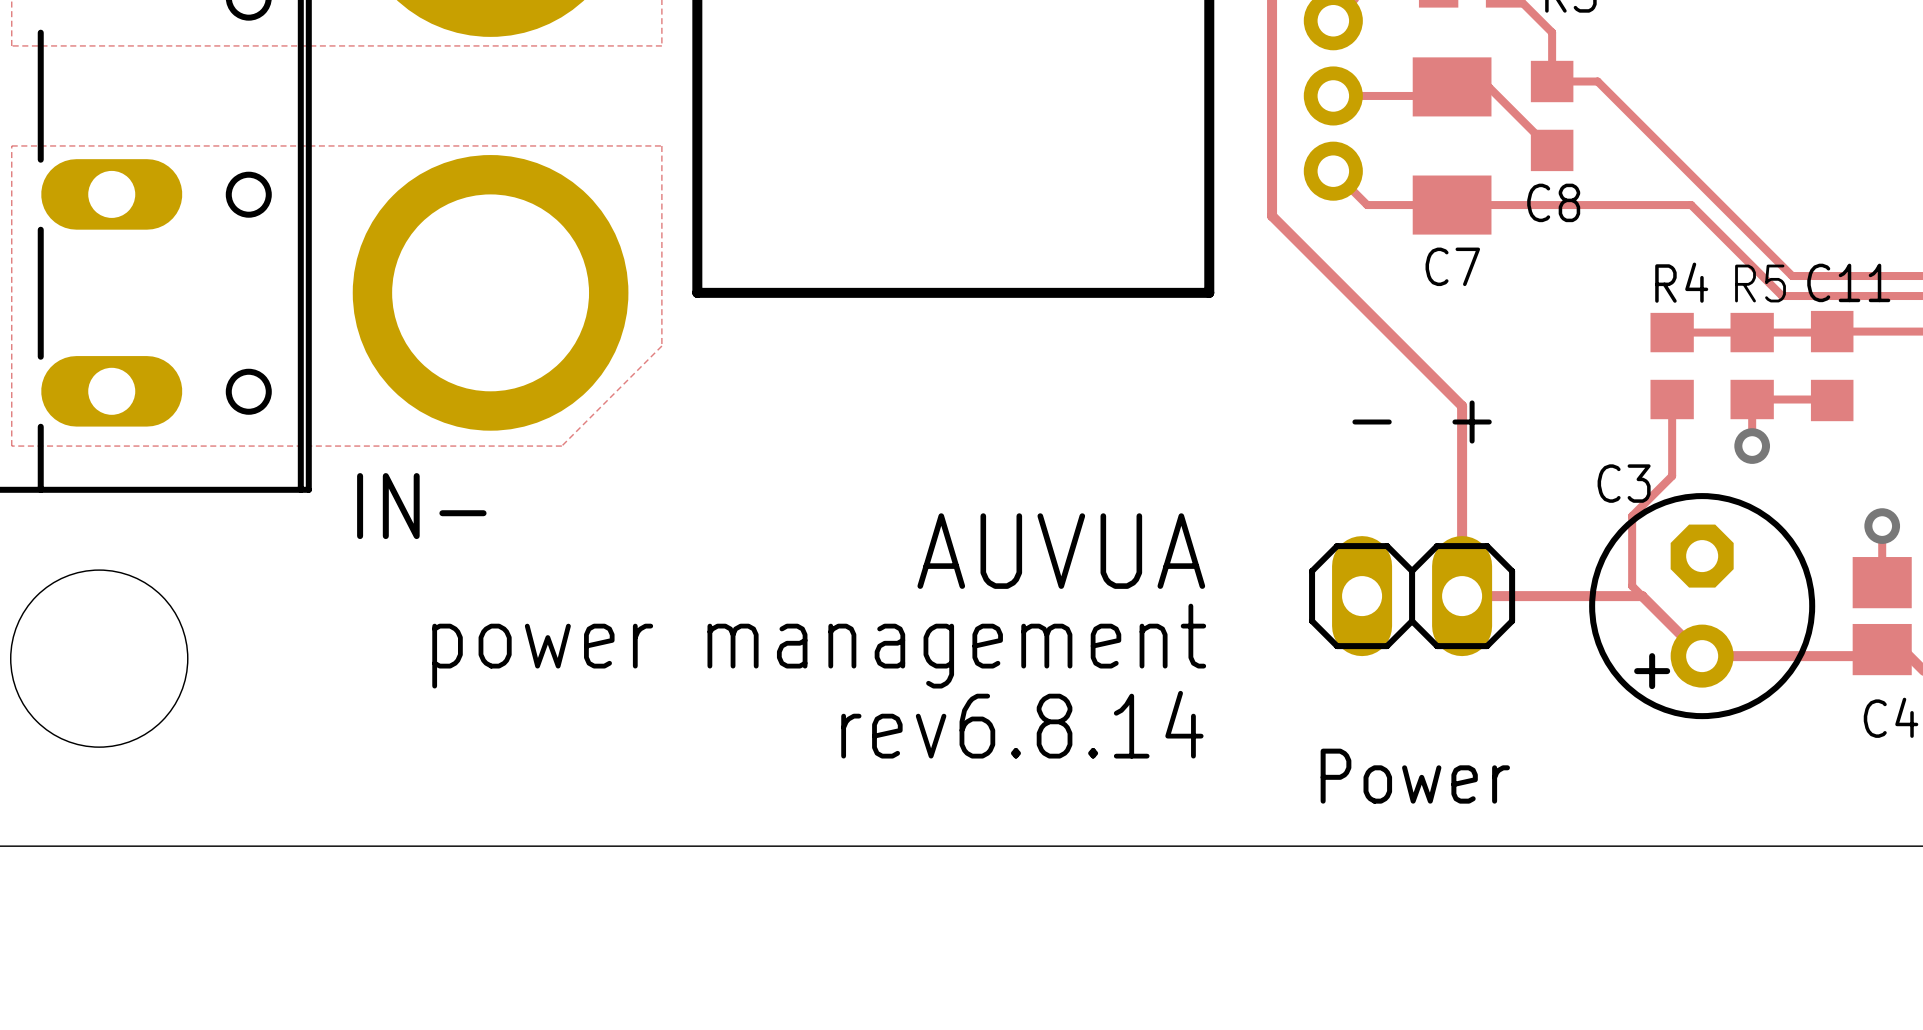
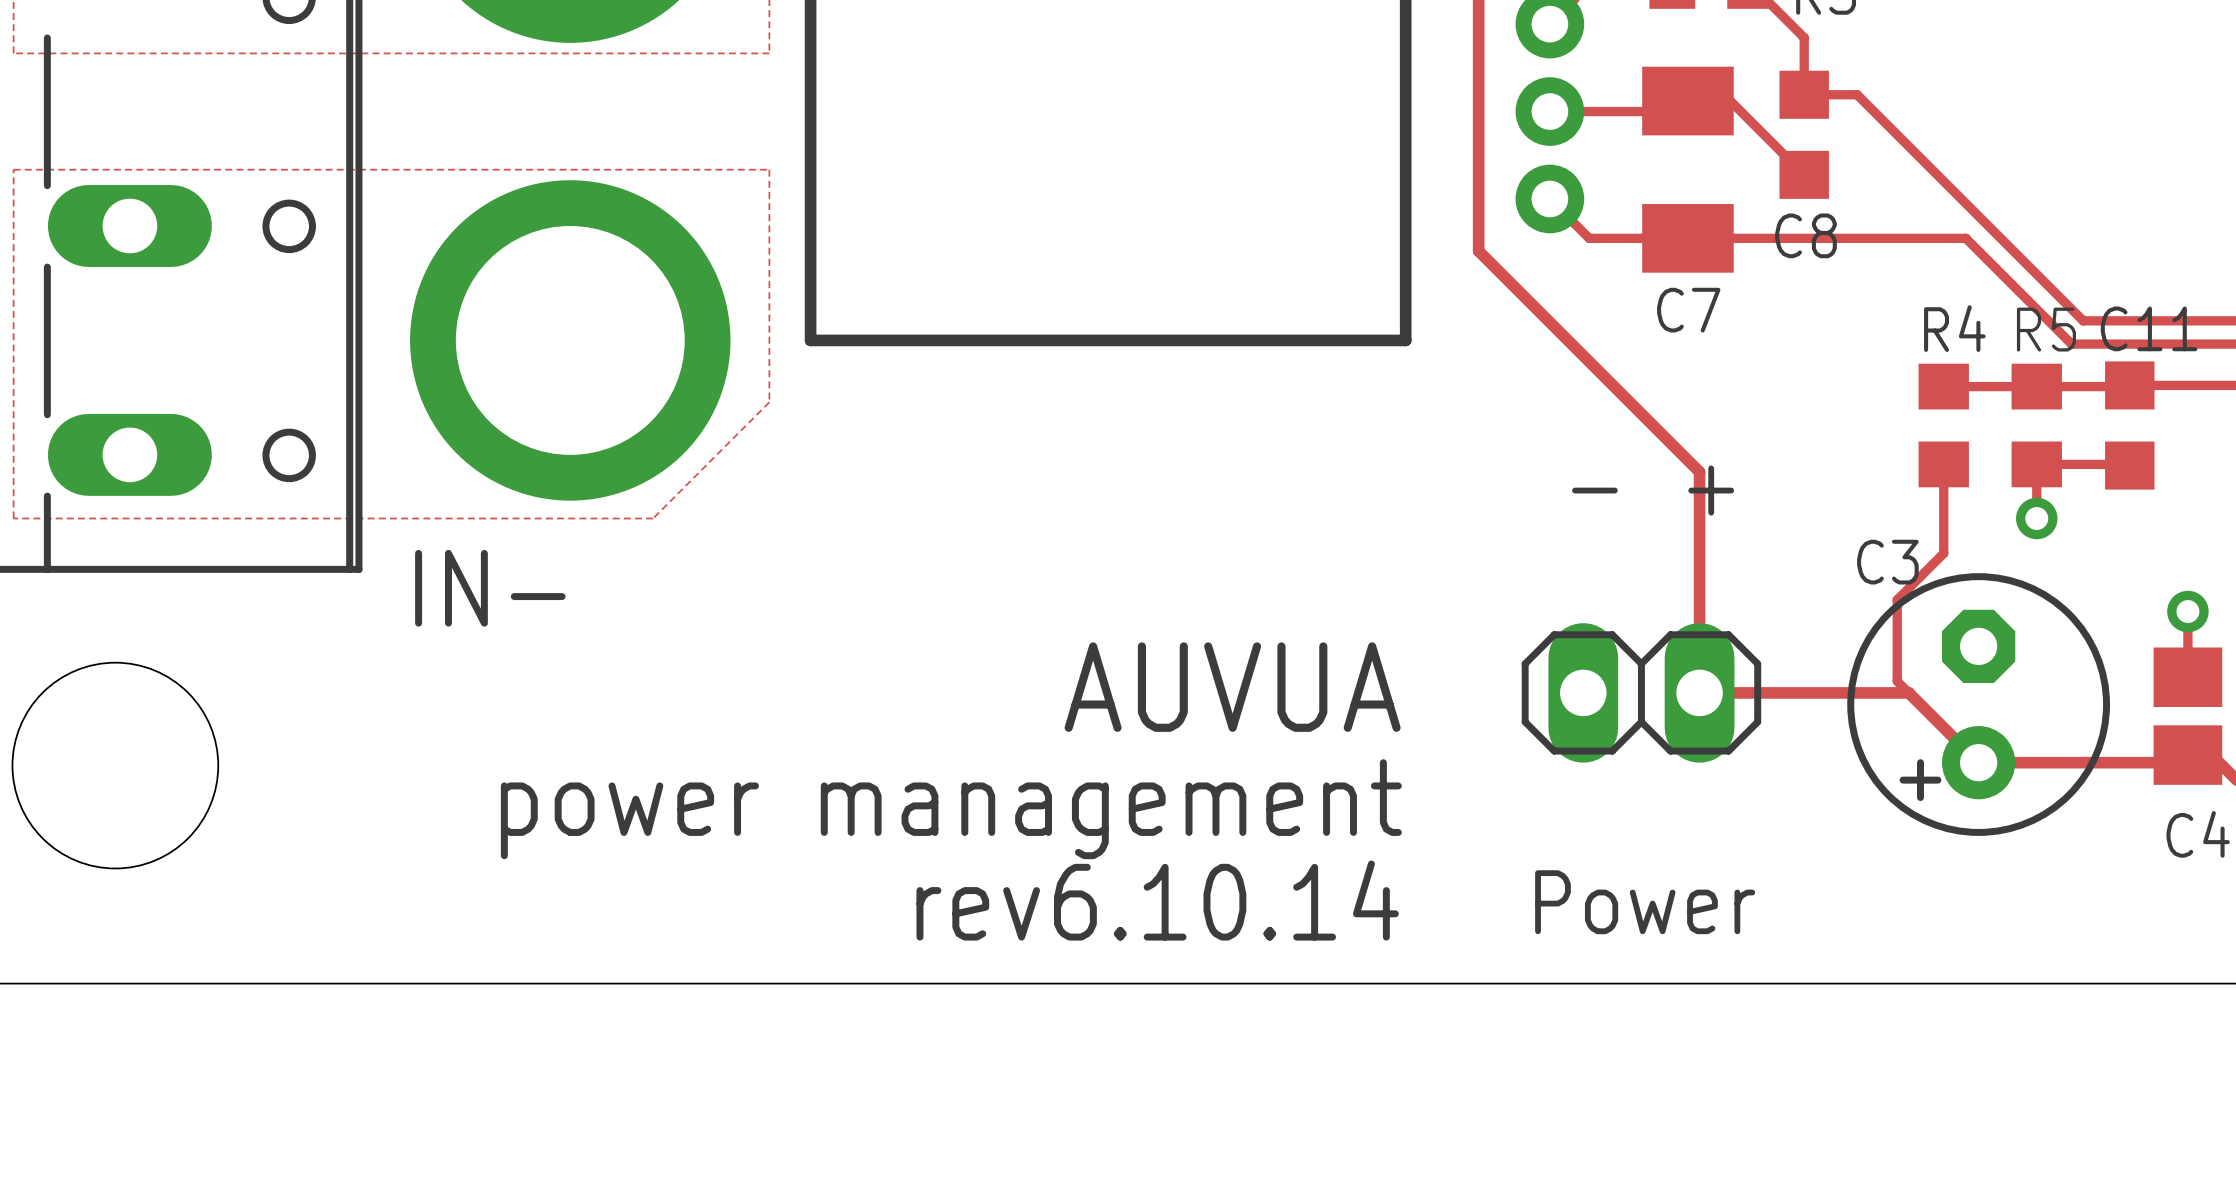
text position: AUVUA (1061, 551) -> AUVUA (1232, 687)
text position: power management (819, 646) -> power management (951, 809)
text: rev6.8.14 (1022, 724) -> rev6.10.14 (1157, 900)

